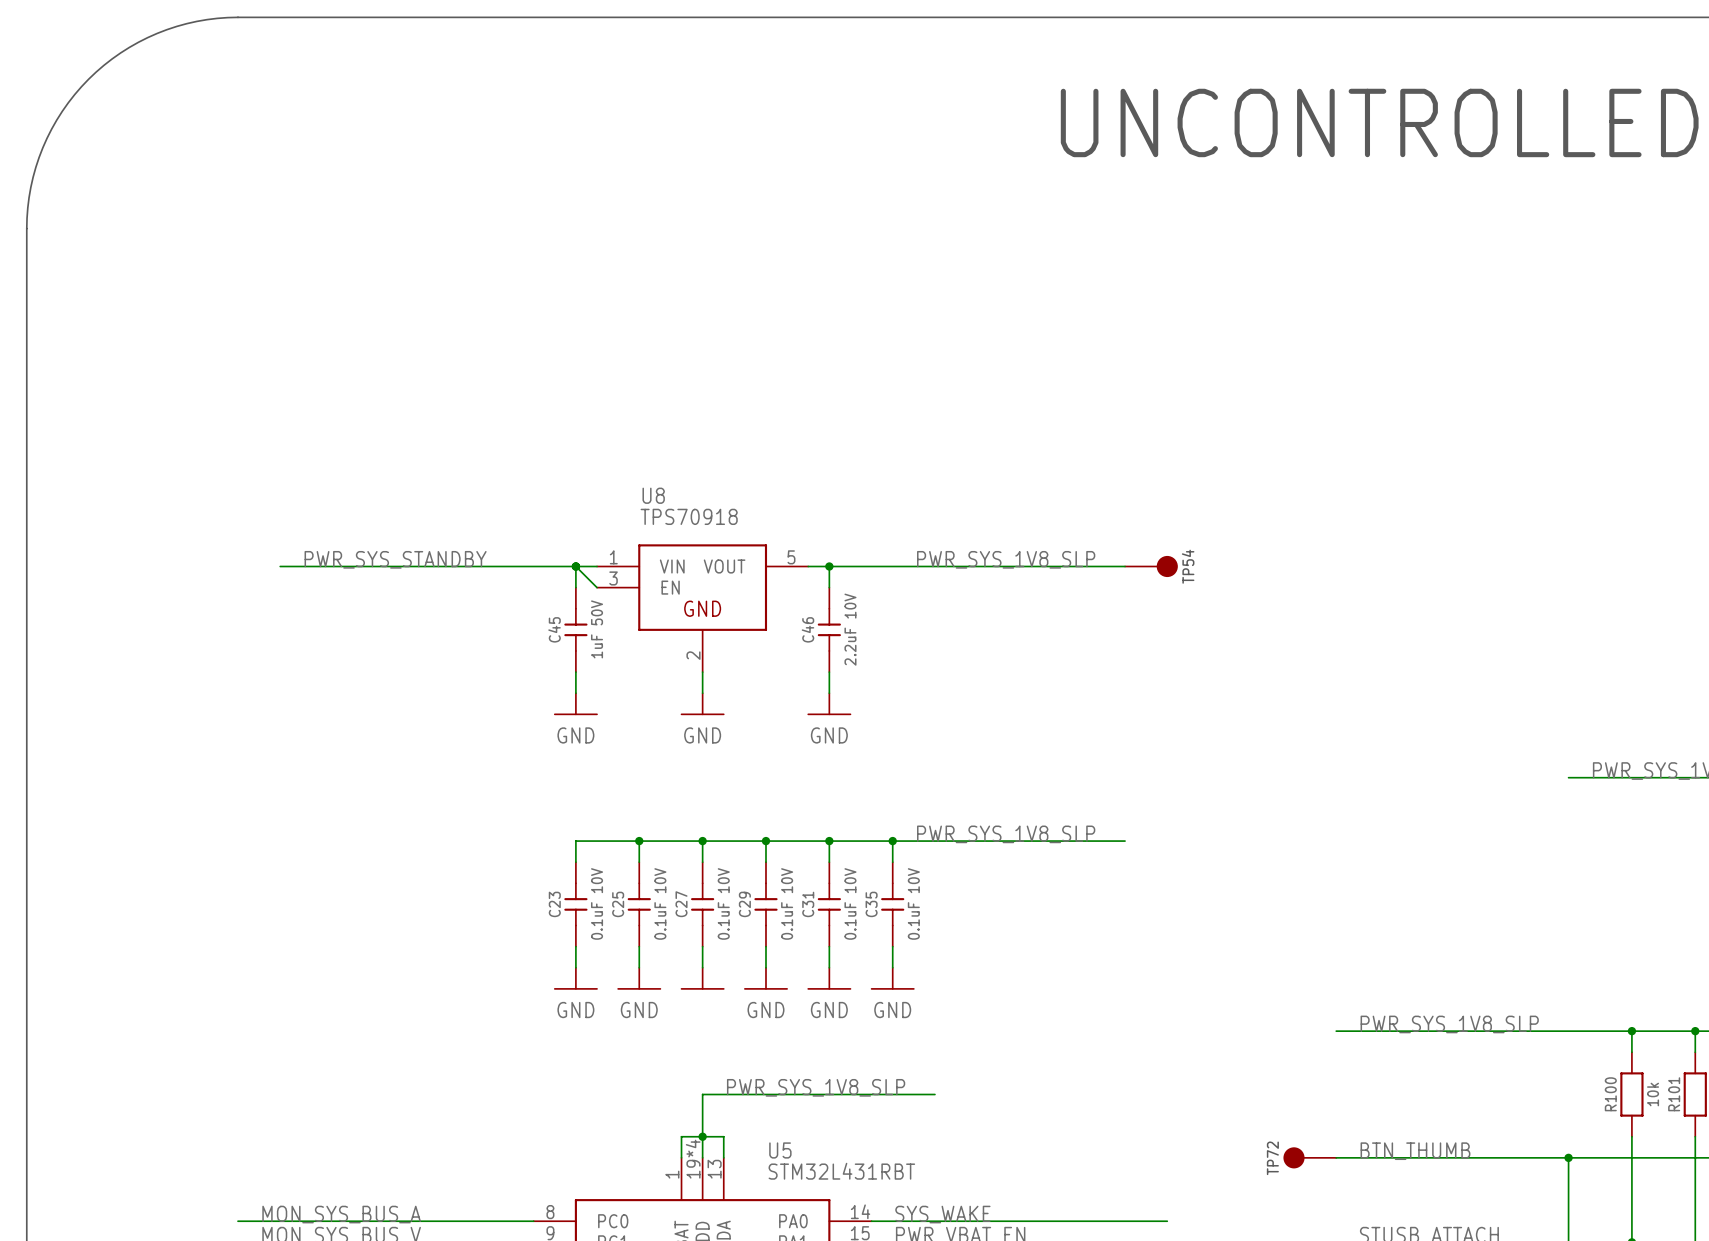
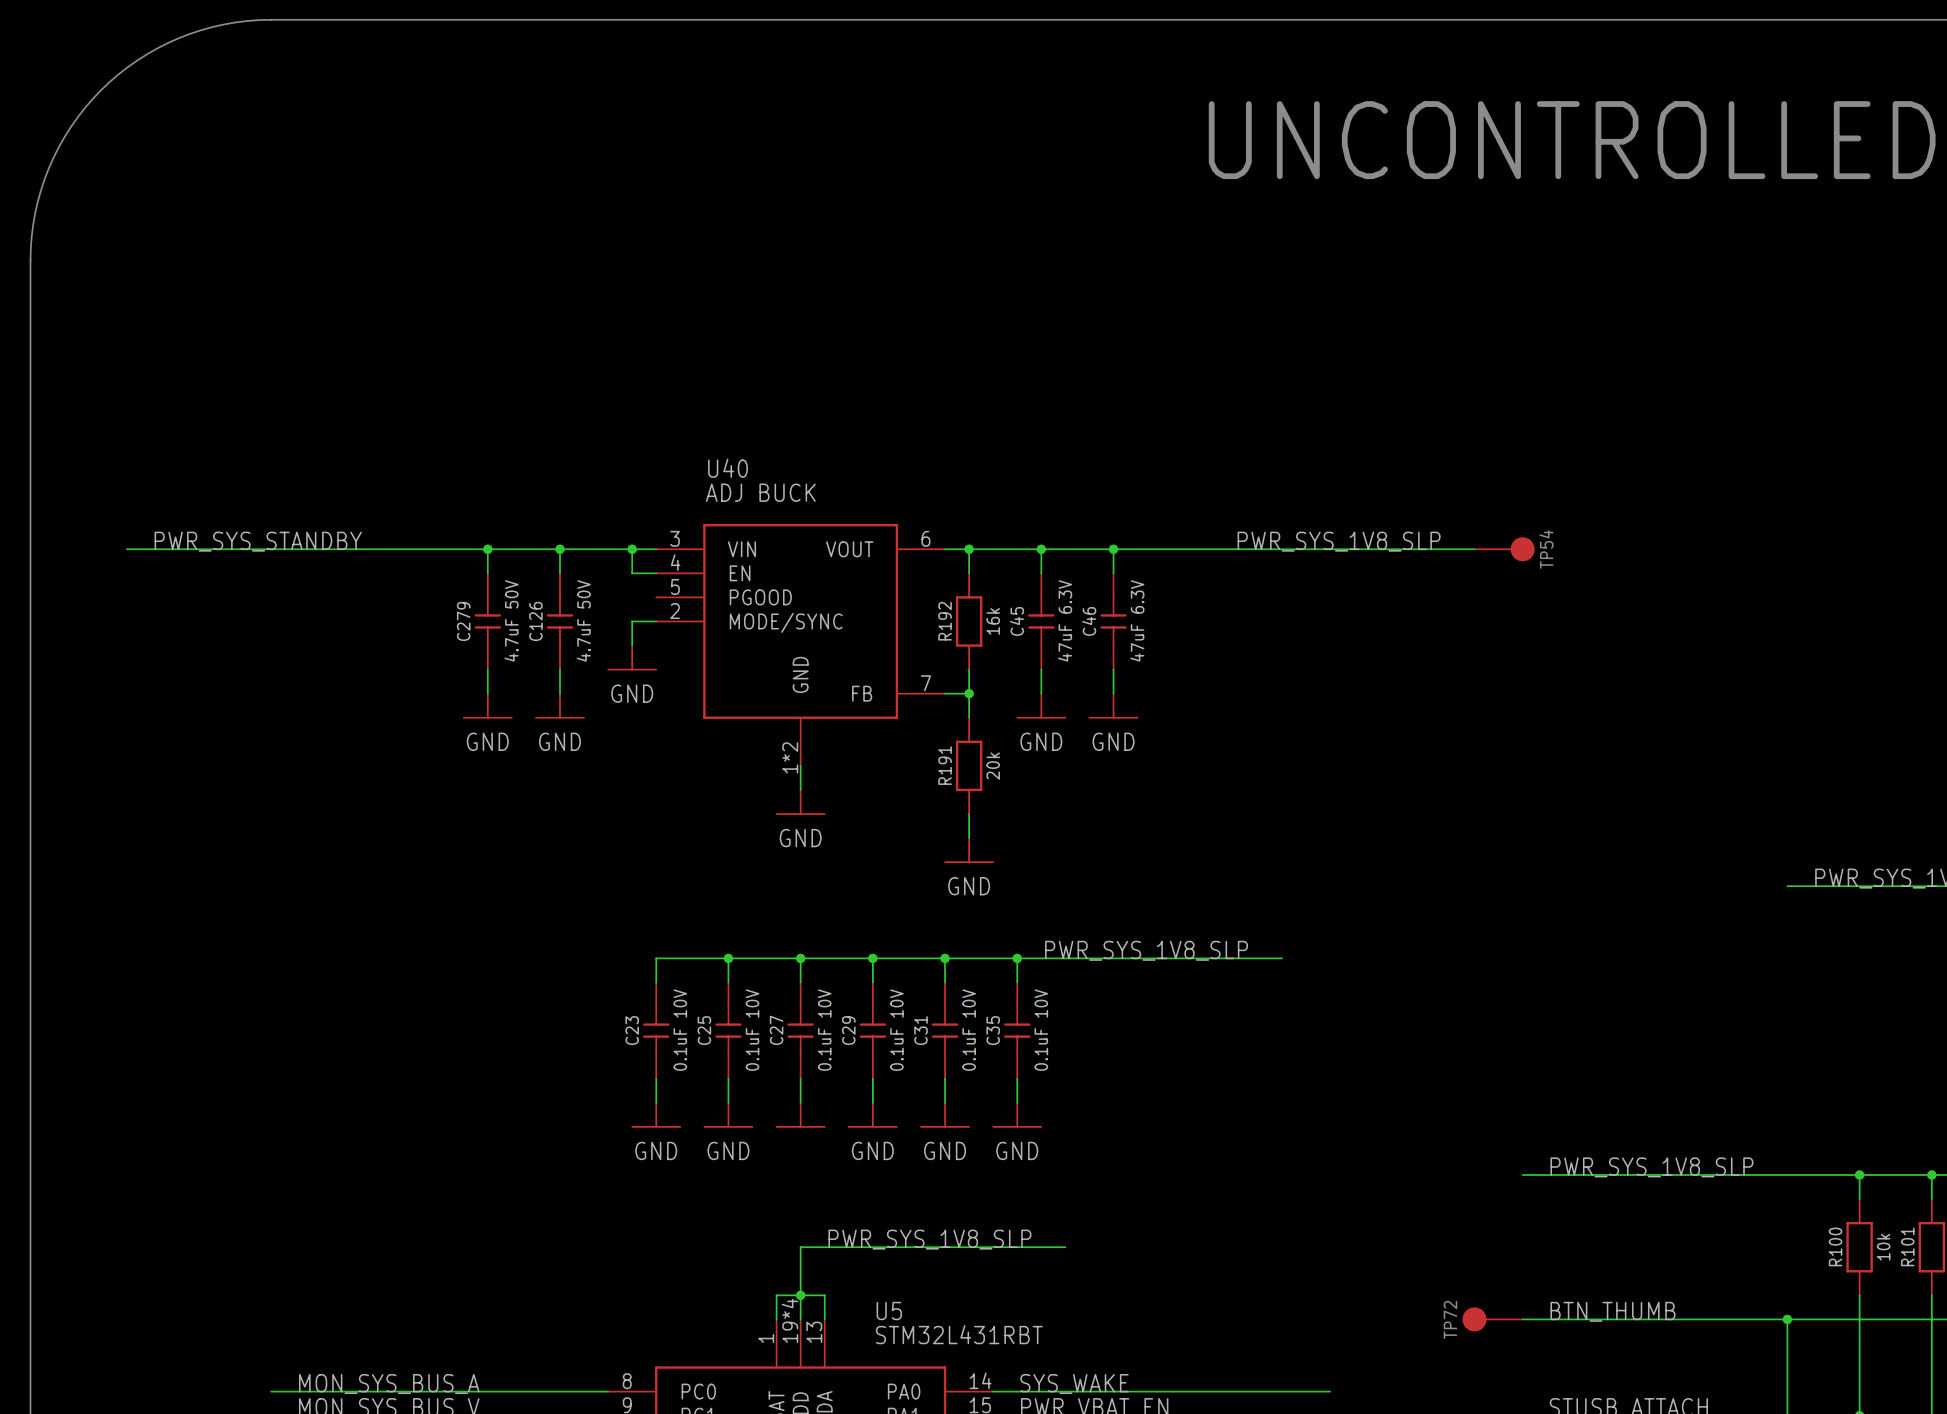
wire: none -> (126, 549) (656, 549)
wire: none -> (487, 549) (487, 573)
junction: none -> (487, 549)
wire: none -> (559, 549) (559, 573)
junction: none -> (559, 549)
wire: none -> (632, 549) (632, 573) (656, 573)
junction: none -> (632, 549)
wire: none -> (945, 549) (1474, 549)
wire: none -> (969, 549) (969, 573)
junction: none -> (969, 549)
junction: none -> (1041, 549)
wire: none -> (1113, 549) (1113, 573)
junction: none -> (1113, 549)
C279: none -> 4.7uF 50V (487, 621)
C126: none -> 4.7uF 50V (559, 621)
wire: none -> (656, 621) (632, 621) (632, 645)
R192: none -> 16k (969, 621)
label position: PWR_SYS_STANDBY (395, 559) -> PWR_SYS_STANDBY (258, 541)
label position: PWR_SYS_1V8_SLP (1006, 559) -> PWR_SYS_1V8_SLP (1339, 541)
U40: none -> ADJ BUCK (800, 644)
wire: (280, 566) (597, 566) -> none
junction: (575, 566) -> none
wire: (808, 566) (1125, 566) -> none
wire: (829, 566) (829, 587) -> (1041, 549) (1041, 573)
junction: (829, 566) -> none
TP54 position: (1151, 566) -> (1504, 549)
power symbol: none -> GND (632, 657)
wire: none -> (487, 669) (487, 693)
wire: (575, 587) (575, 566) (597, 587) -> none
wire: none -> (969, 669) (969, 717)
wire: none -> (1113, 669) (1113, 693)
U8: TPS70918 (702, 608) -> none
wire: none -> (945, 693) (969, 693)
junction: none -> (969, 693)
power symbol: none -> GND (487, 706)
power symbol: none -> GND (559, 706)
power symbol: none -> GND (1041, 706)
power symbol: none -> GND (1113, 706)
C45 position: (575, 629) -> (1041, 621)
C45 value: 1uF 50V (597, 629) -> 47uF 6.3V (1065, 620)
C46 position: (829, 629) -> (1113, 621)
C46 value: 2.2uF 10V (850, 629) -> 47uF 6.3V (1137, 620)
wire: (575, 672) (575, 693) -> (559, 669) (559, 693)
wire: (829, 672) (829, 693) -> (1041, 669) (1041, 693)
R191: none -> 20k (969, 765)
power symbol: GND (575, 704) -> none
power symbol position: GND (829, 704) -> GND (969, 850)
wire: none -> (969, 814) (969, 838)

